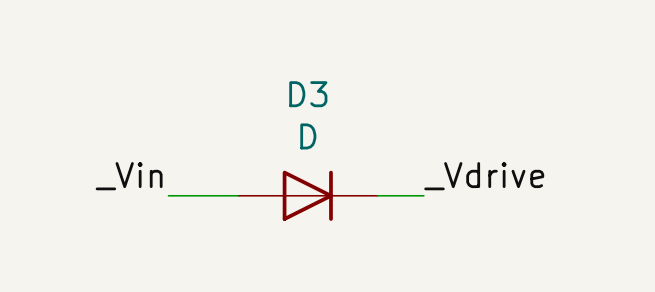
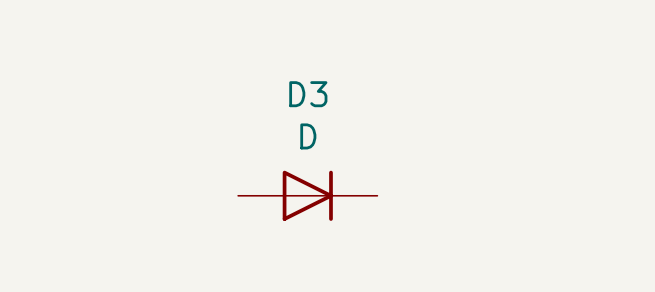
label: _Vin (129, 176) -> none
label: _Vdrive (484, 176) -> none
wire: (168, 195) (238, 195) -> none
wire: (377, 195) (423, 195) -> none

